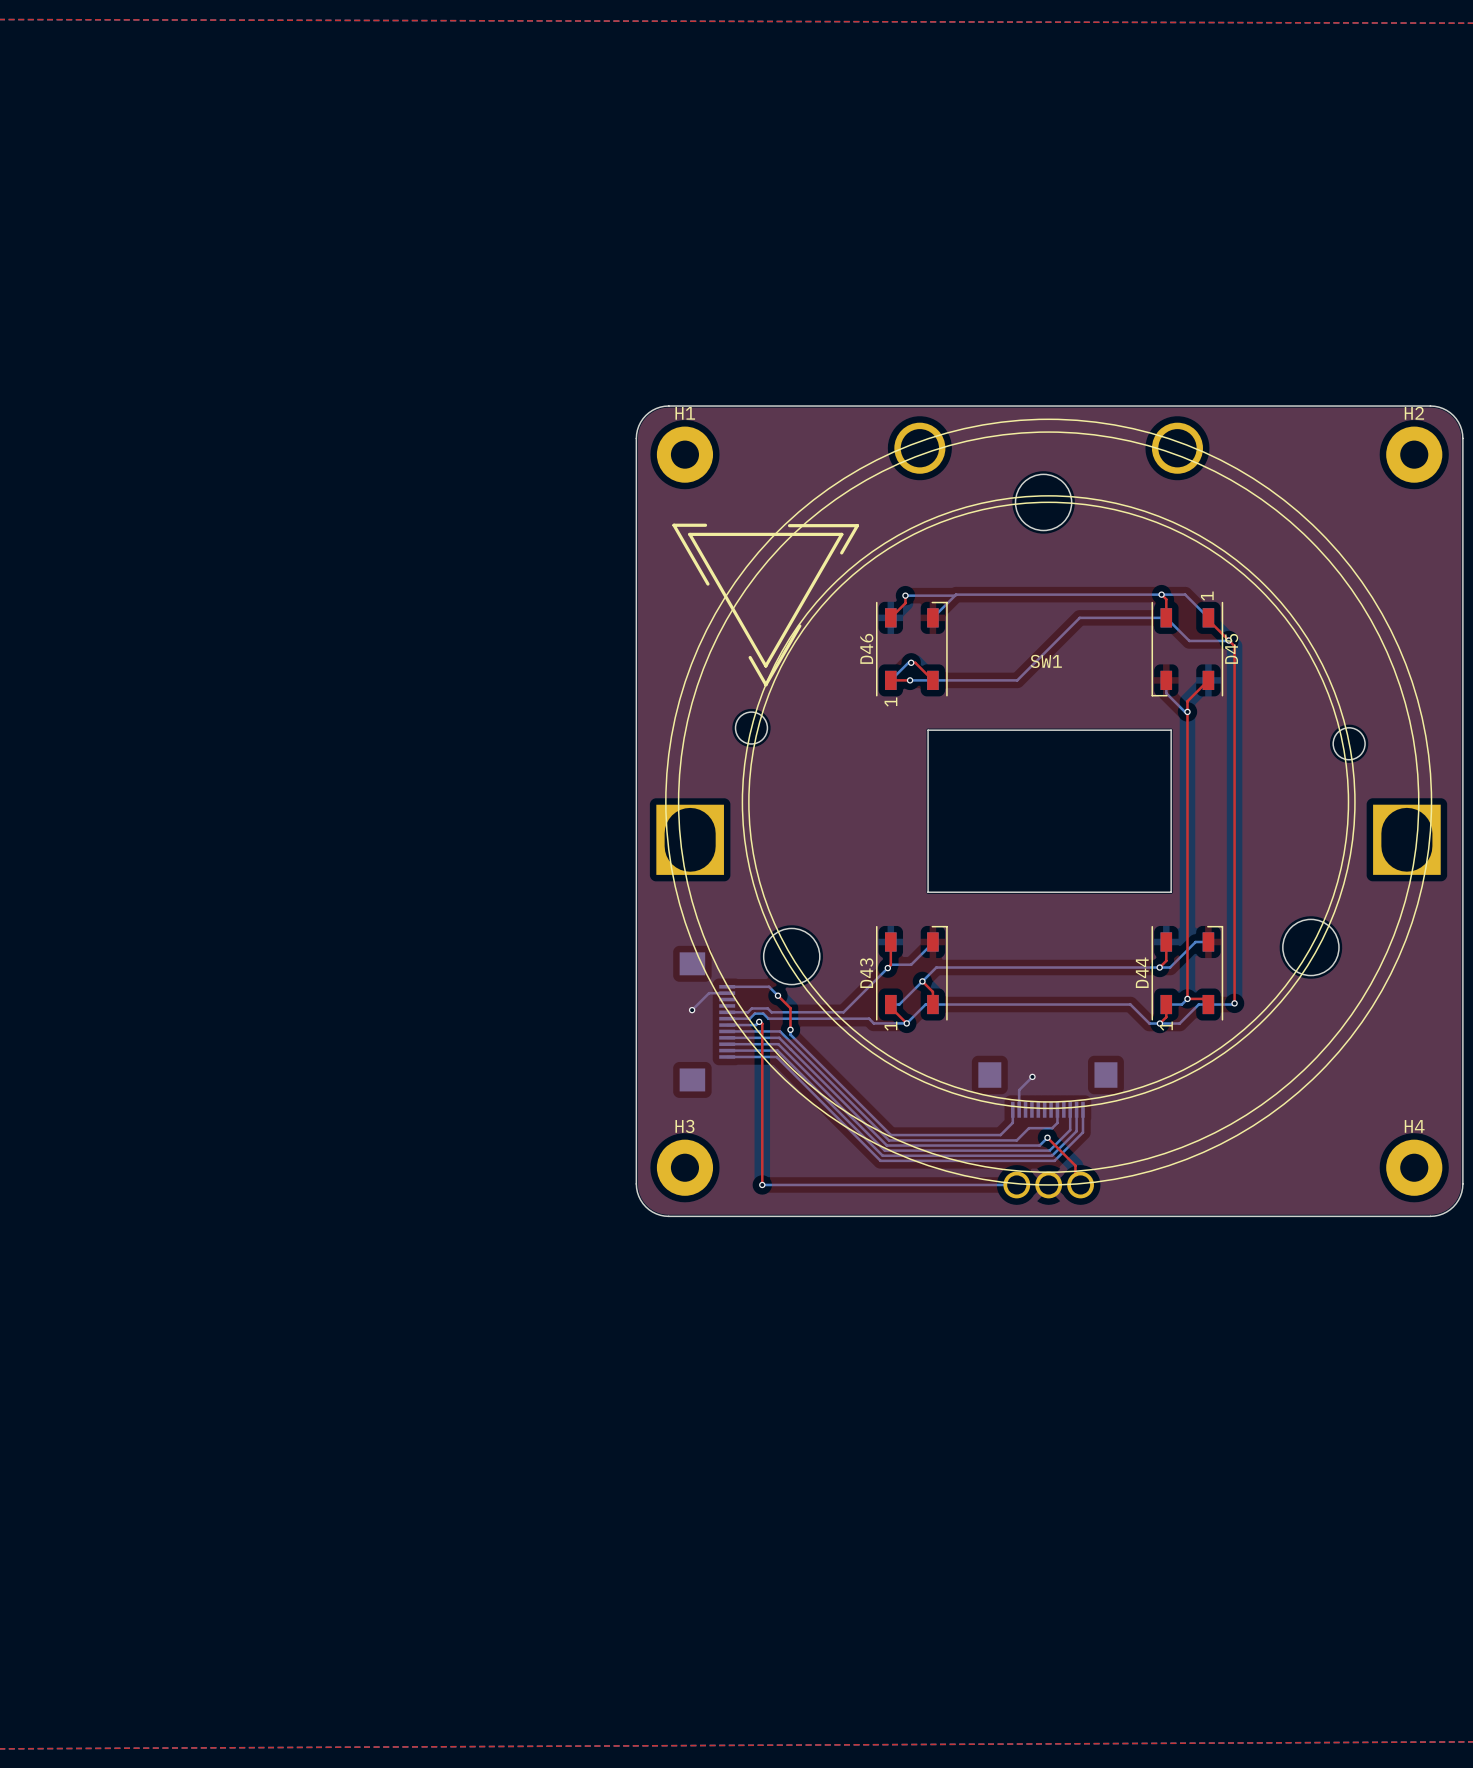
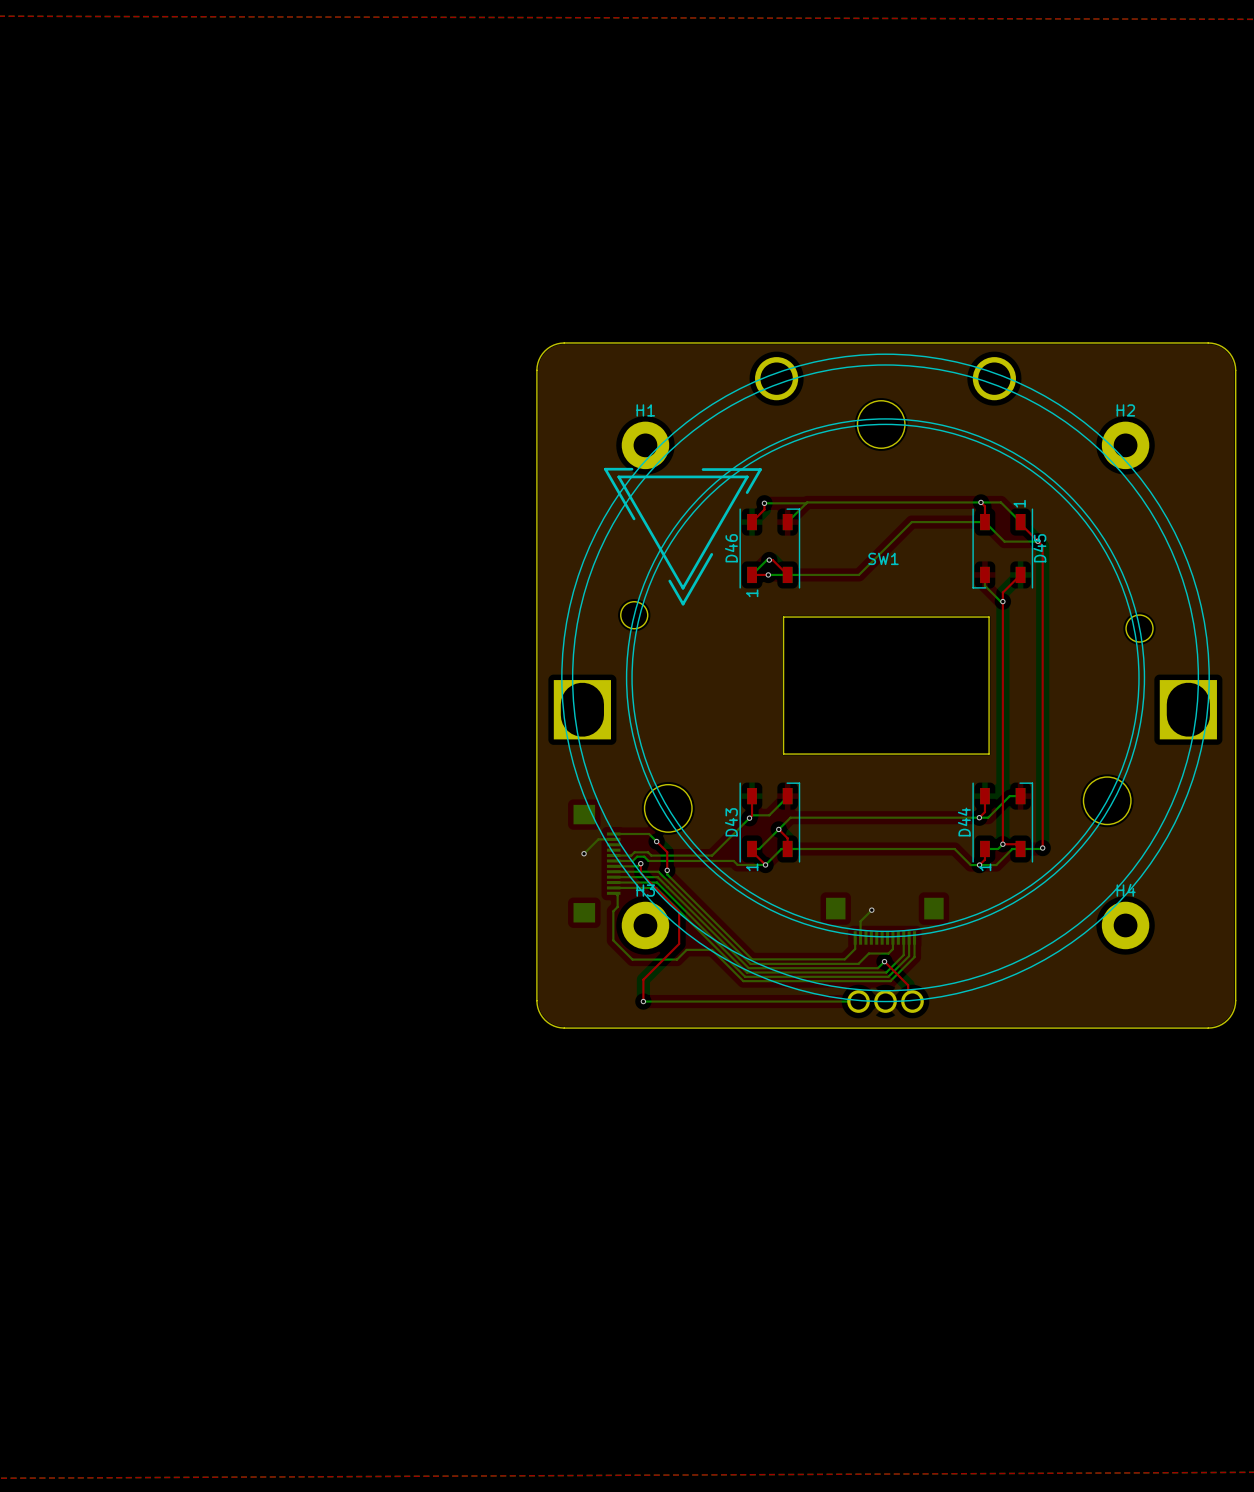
H1 position: (684, 454) -> (645, 445)
H2 position: (1414, 454) -> (1125, 445)
drawing position: (765, 605) -> (682, 536)
top track: (759, 1021) (762, 1023) (762, 1159) -> (640, 863) (640, 873) (679, 911) (679, 943) (643, 979)
bottom track: (729, 1056) (776, 1056) (843, 1123) -> (615, 893) (617, 895) (617, 906) (613, 911) (613, 940) (632, 959) (677, 959) (686, 949) (712, 949)
H3 position: (684, 1167) -> (645, 925)
H4 position: (1414, 1167) -> (1125, 925)

